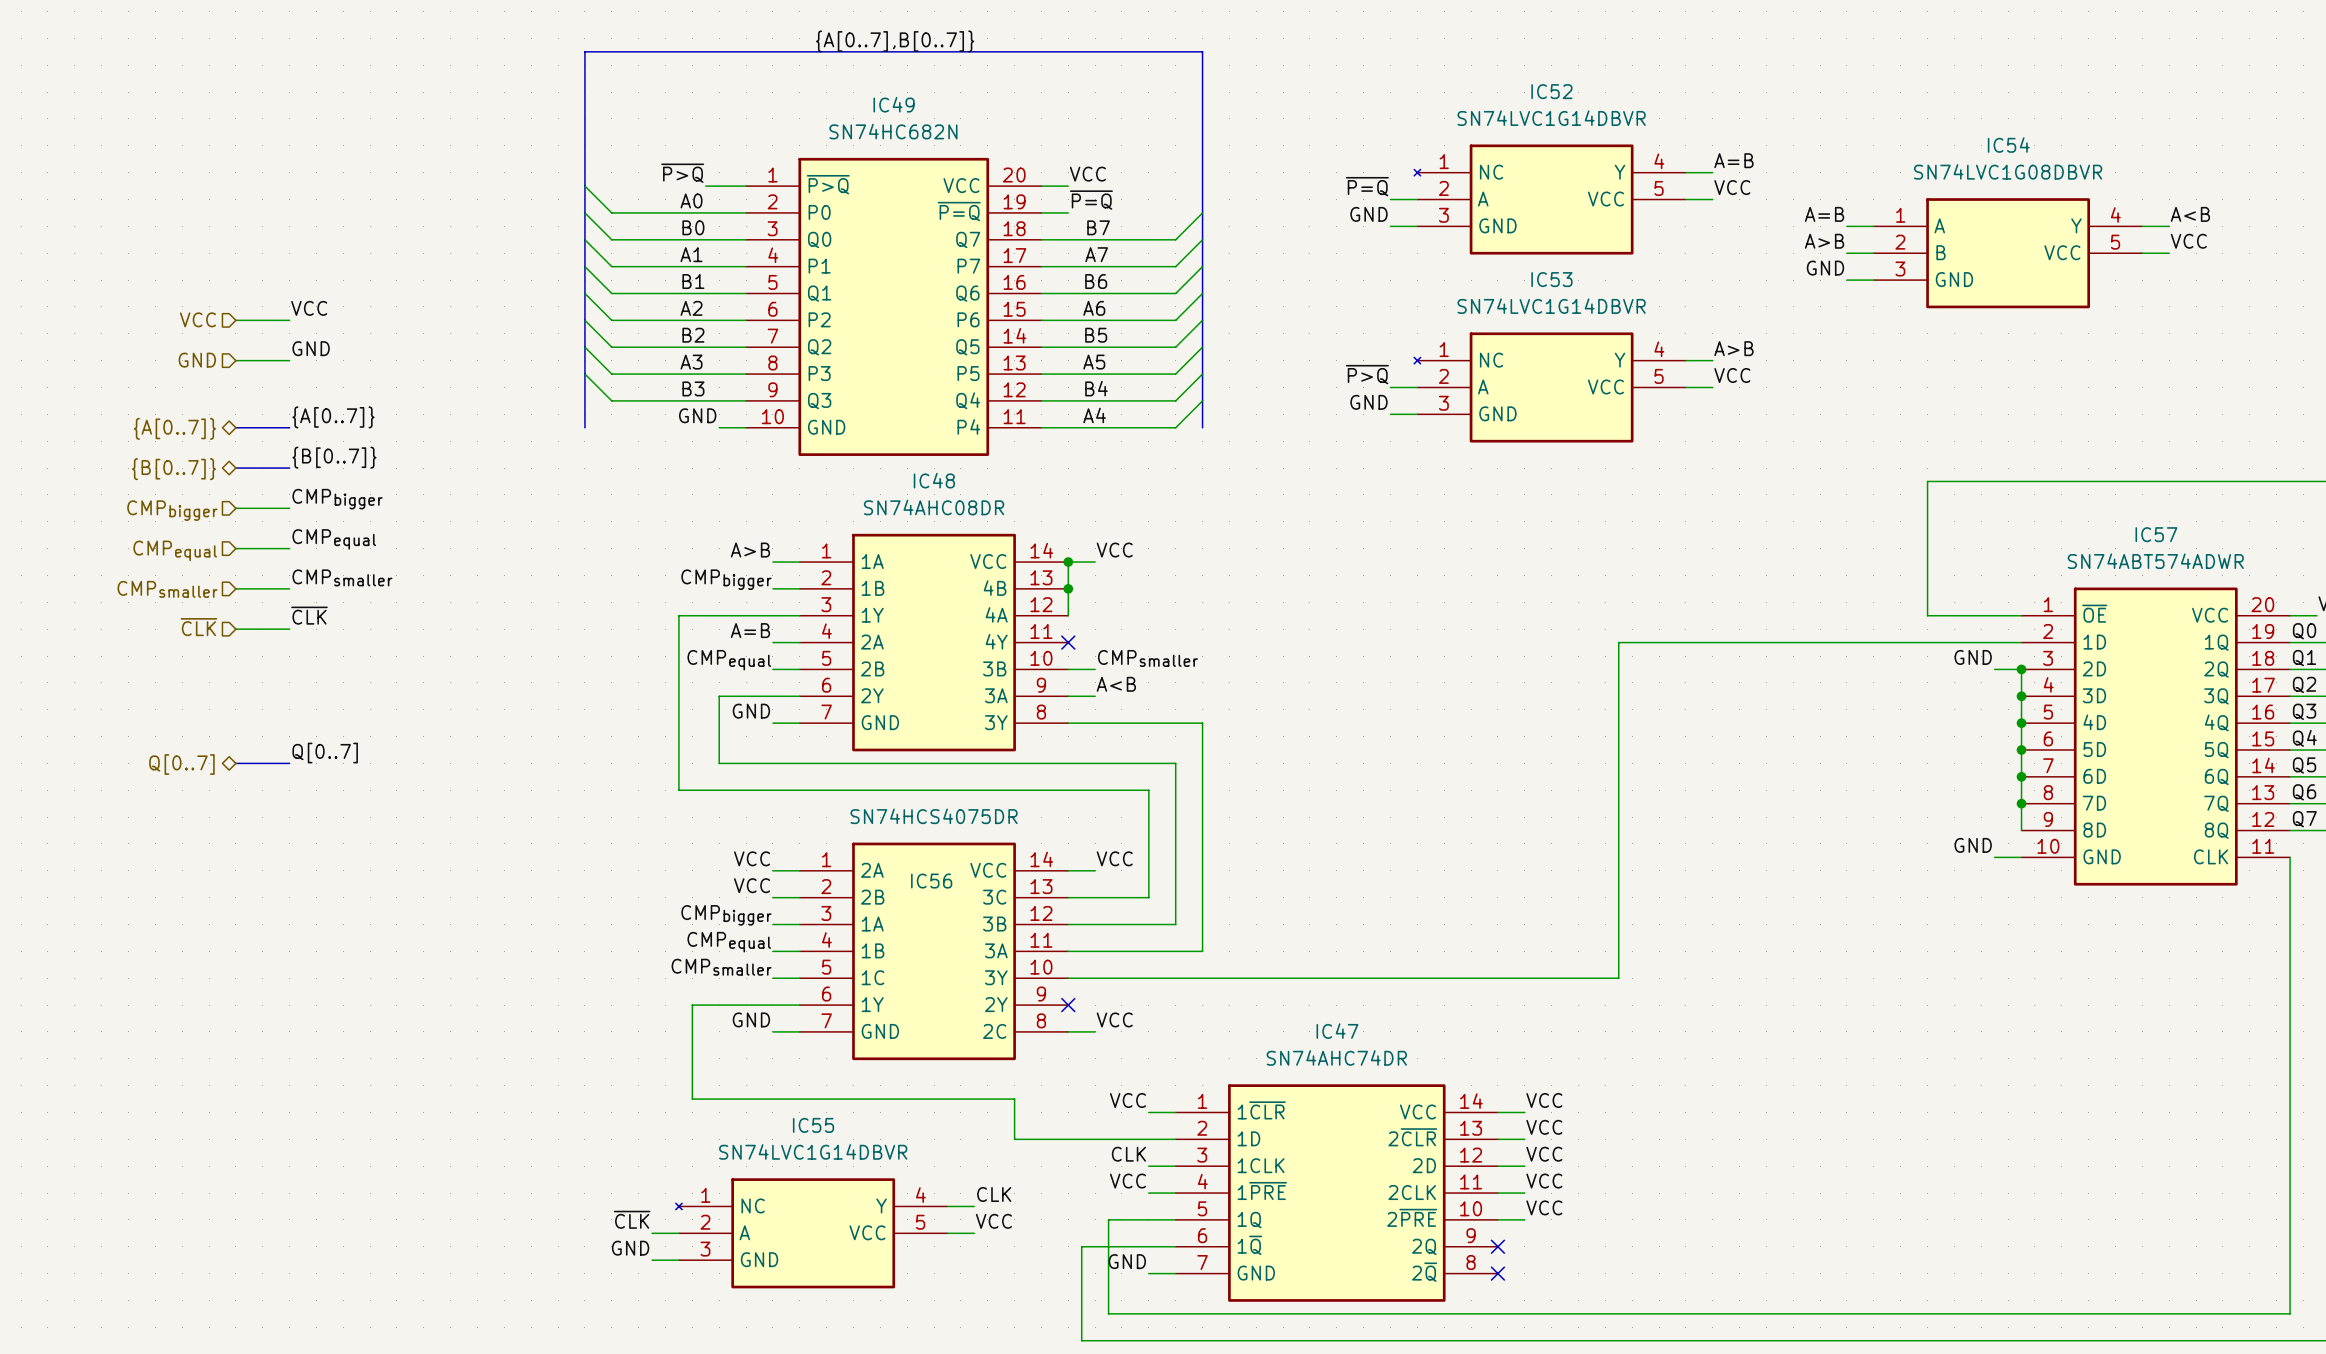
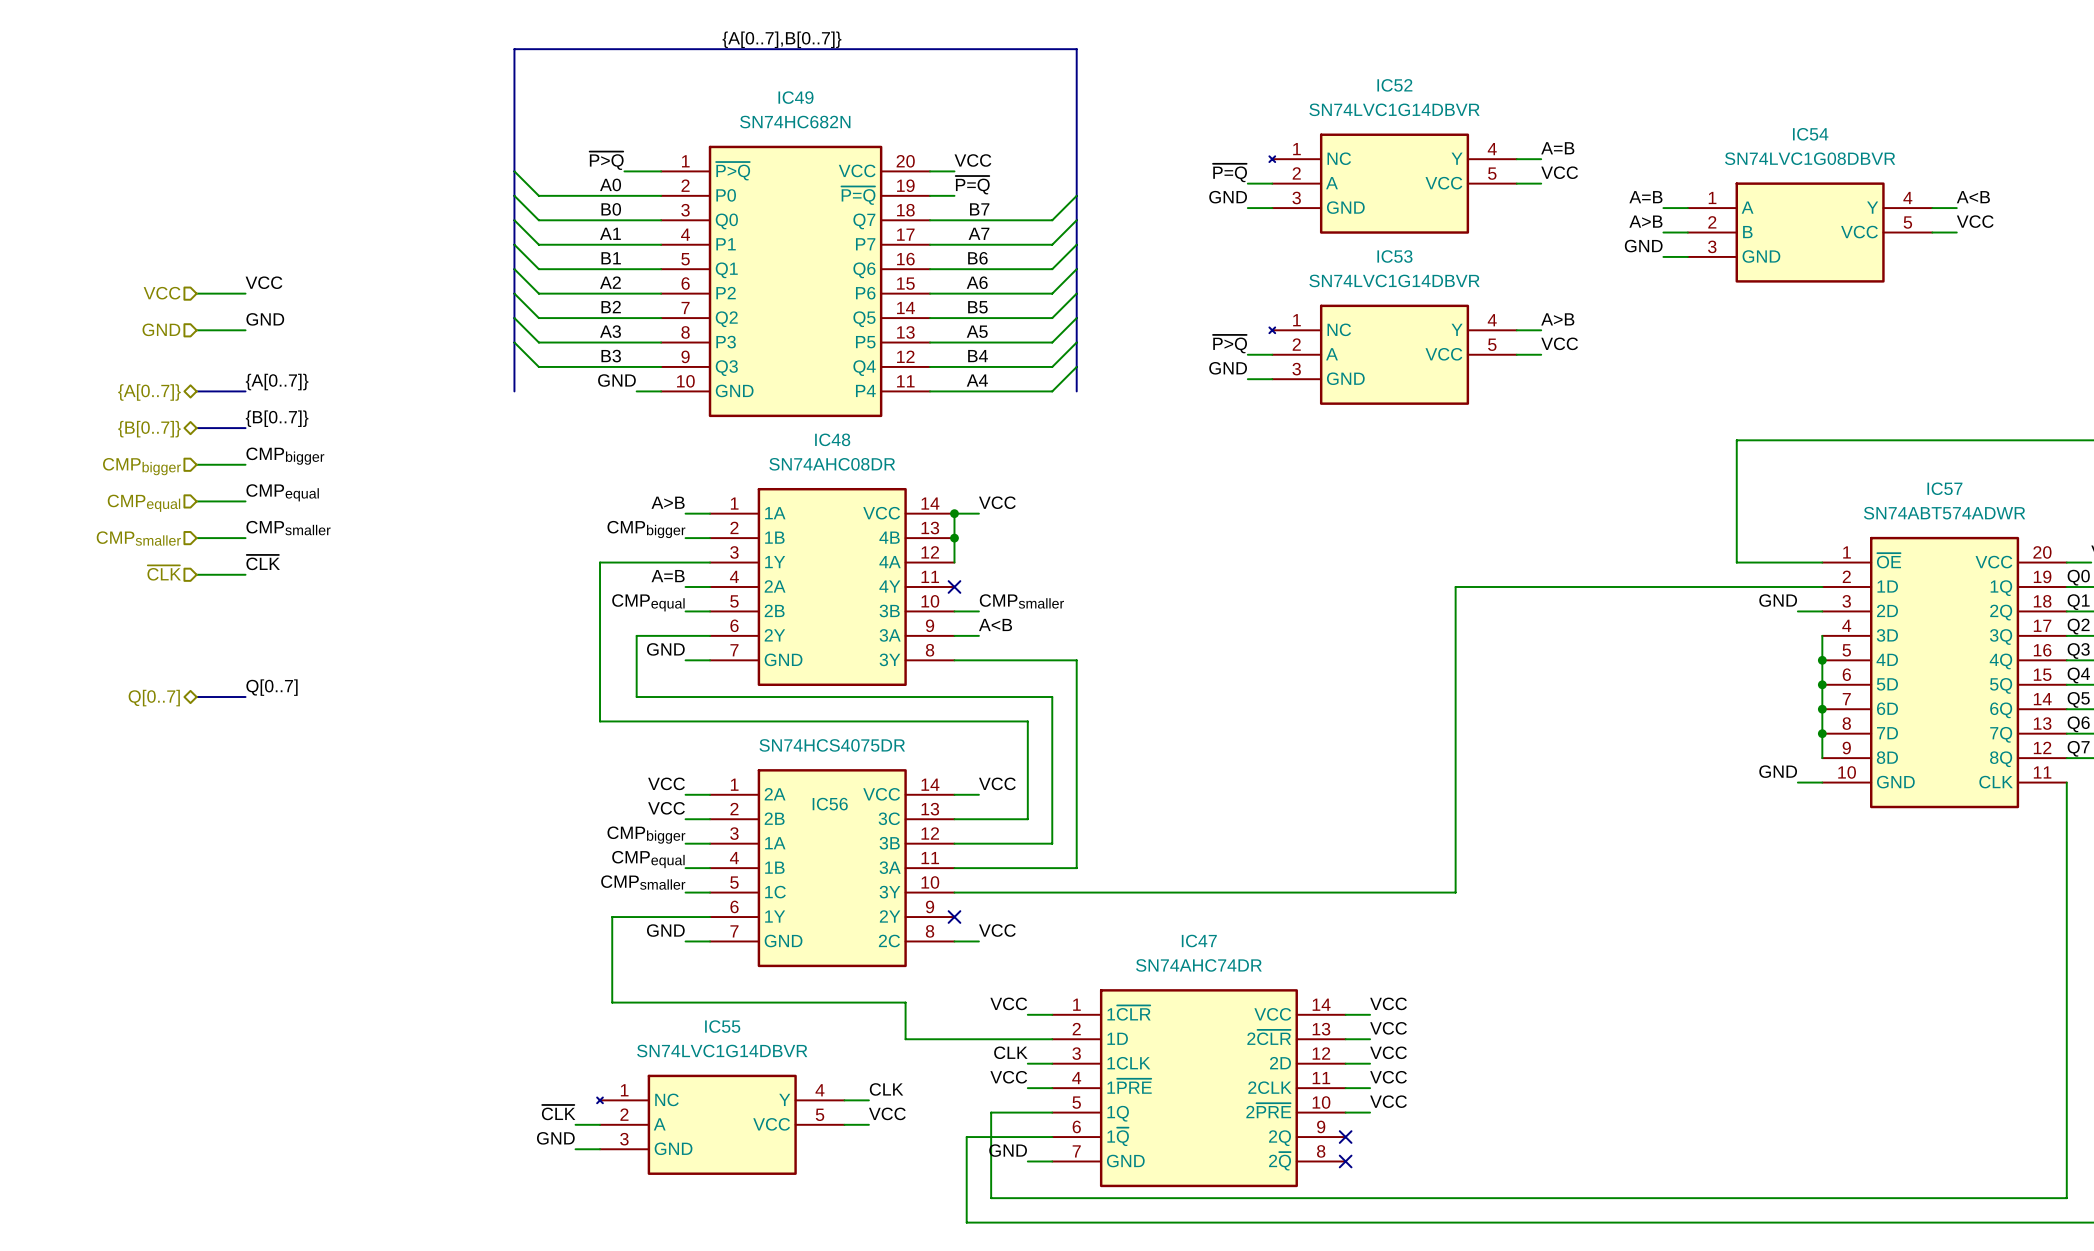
wire: (2021, 669) (2021, 696) -> none
junction: (2021, 669) -> none
junction: (2021, 696) -> none

